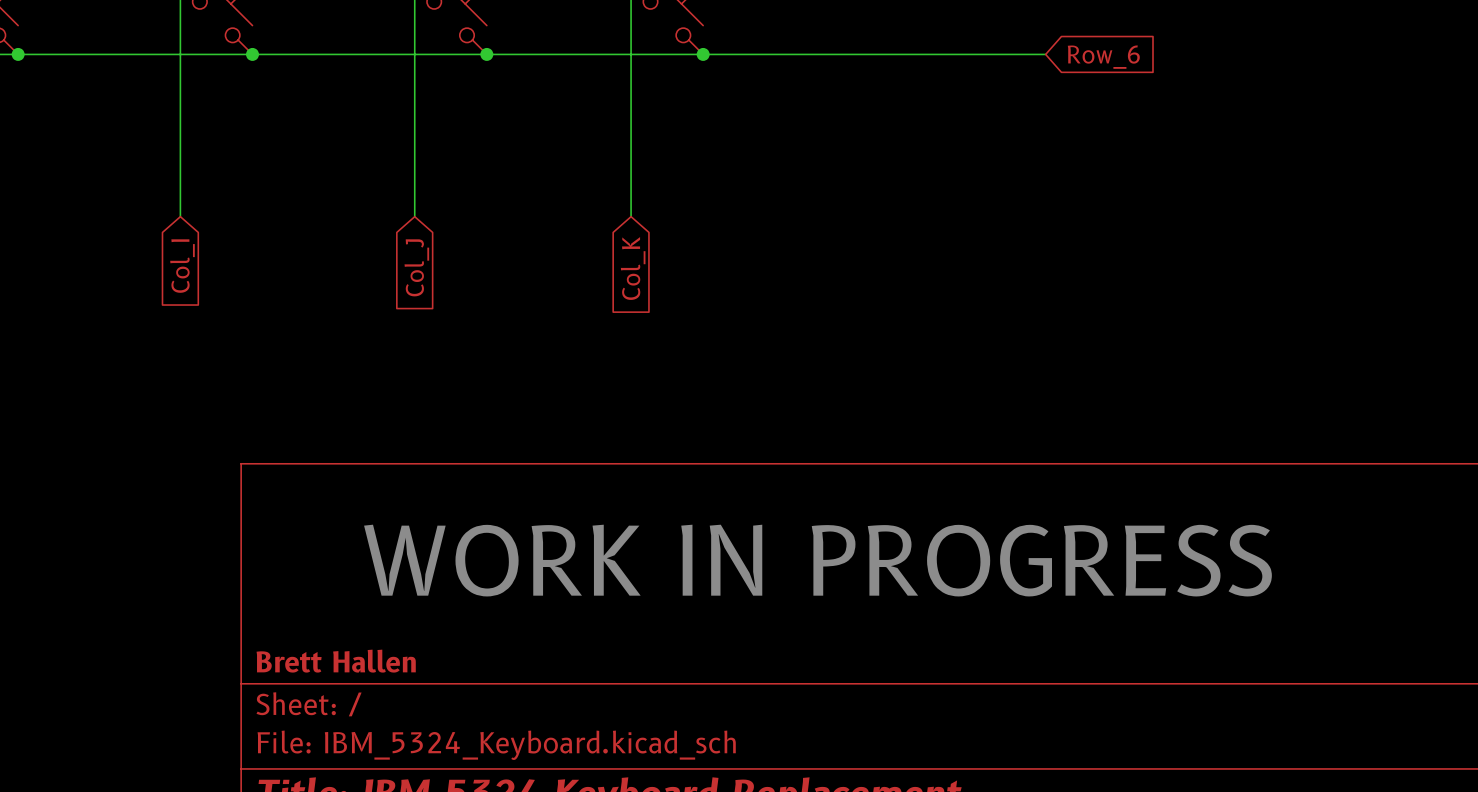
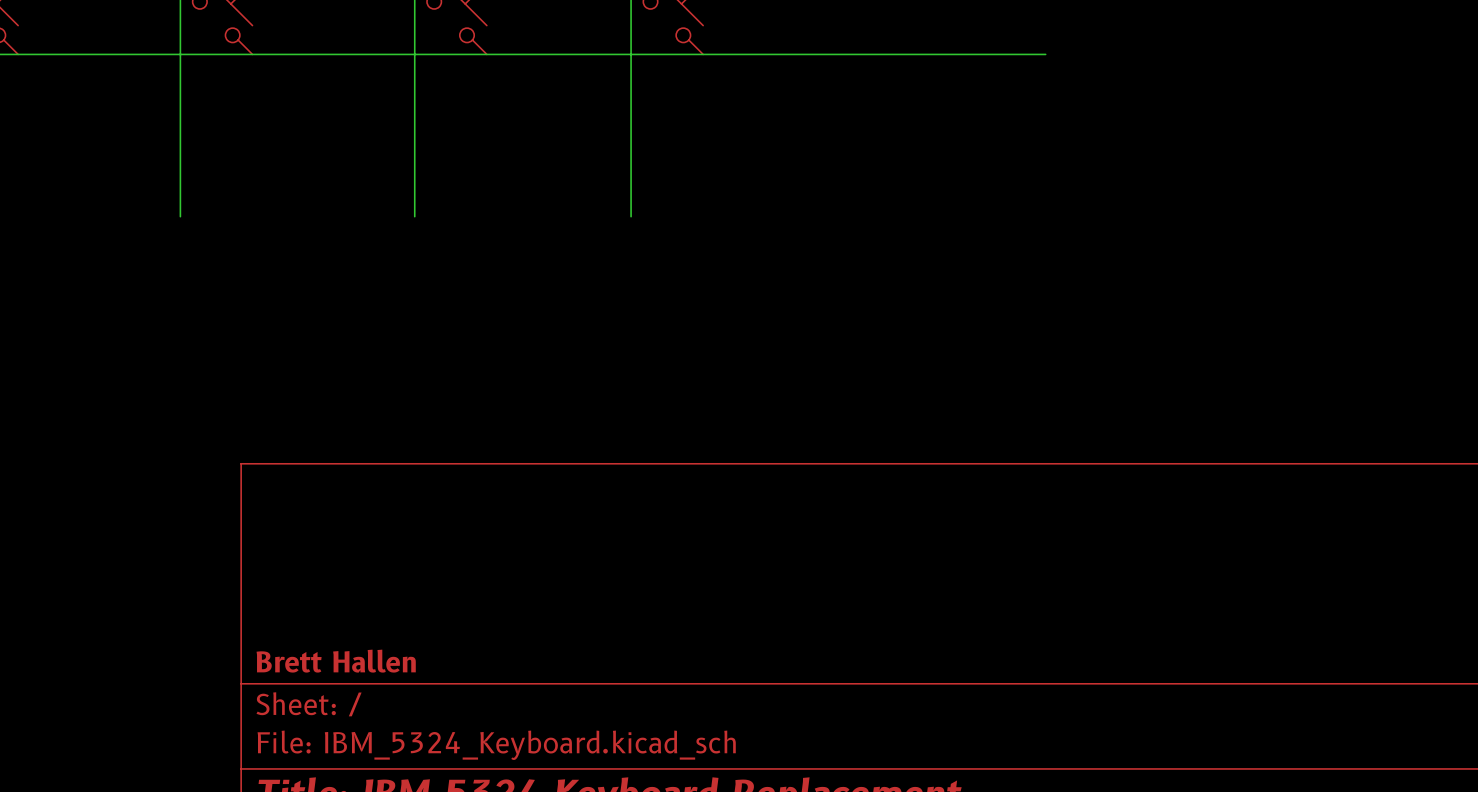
junction: (18, 54) -> none
junction: (252, 54) -> none
junction: (486, 54) -> none
junction: (703, 54) -> none
global label: Row_6 (1103, 57) -> none
global label: Col_I (182, 266) -> none
global label: Col_J (416, 267) -> none
global label: Col_K (633, 268) -> none
text: WORK IN PROGRESS (817, 560) -> none

